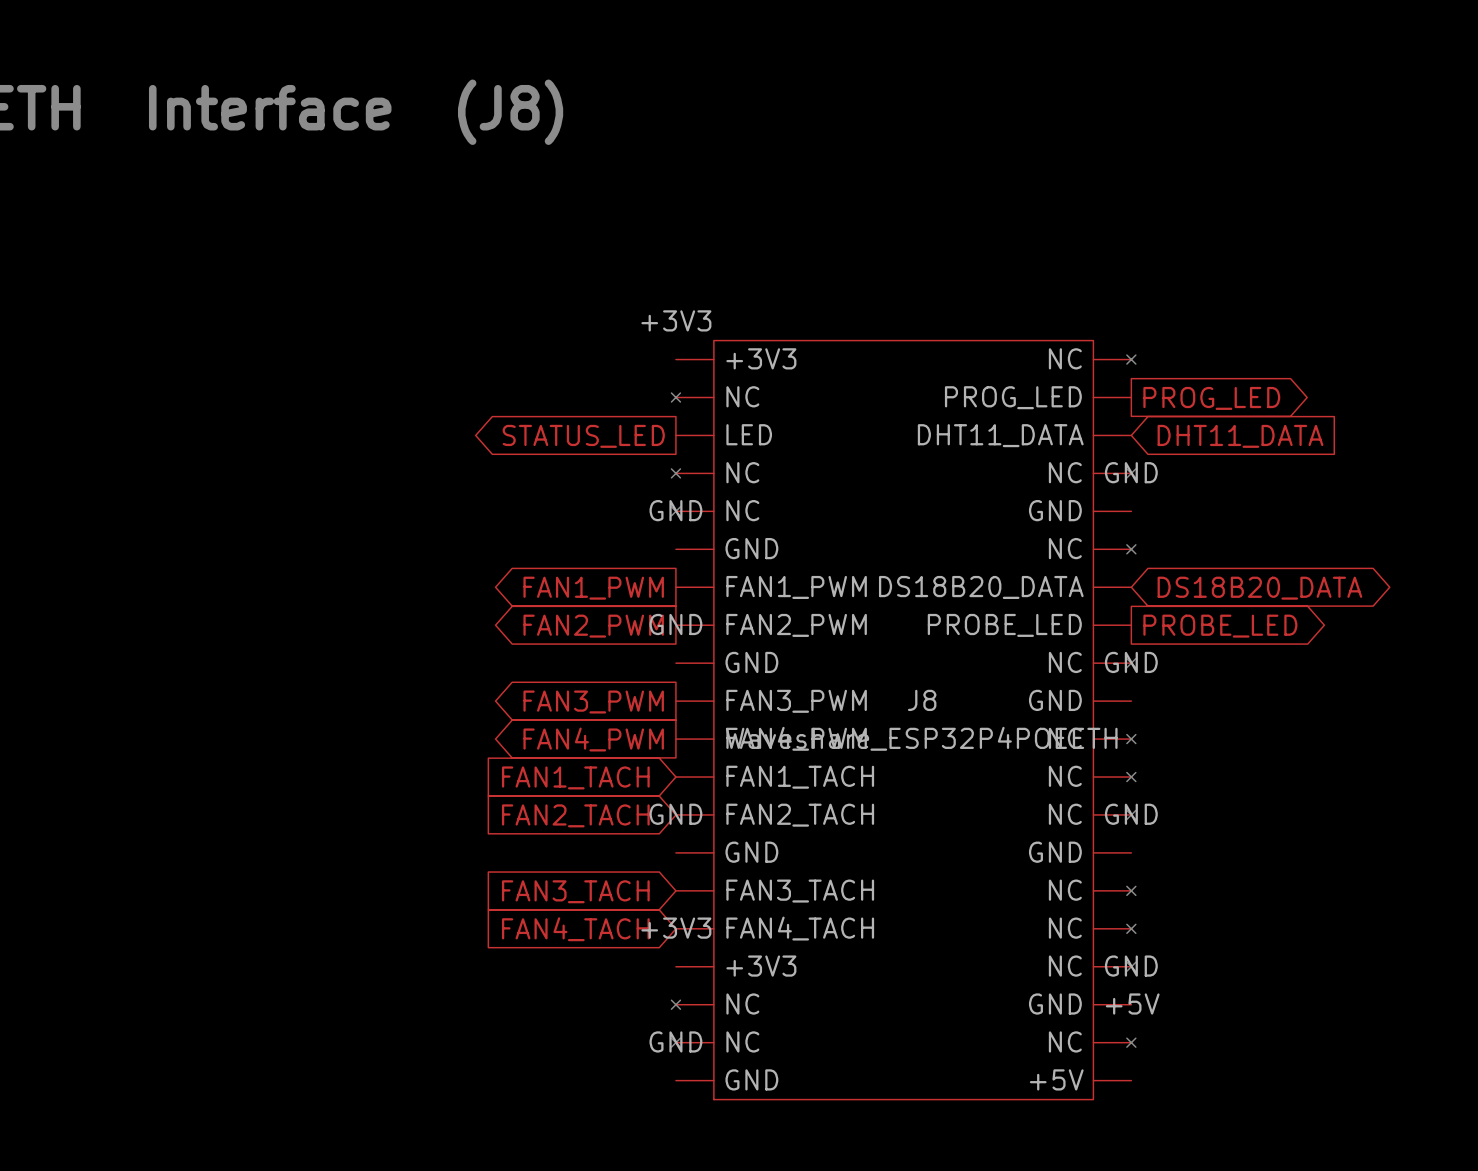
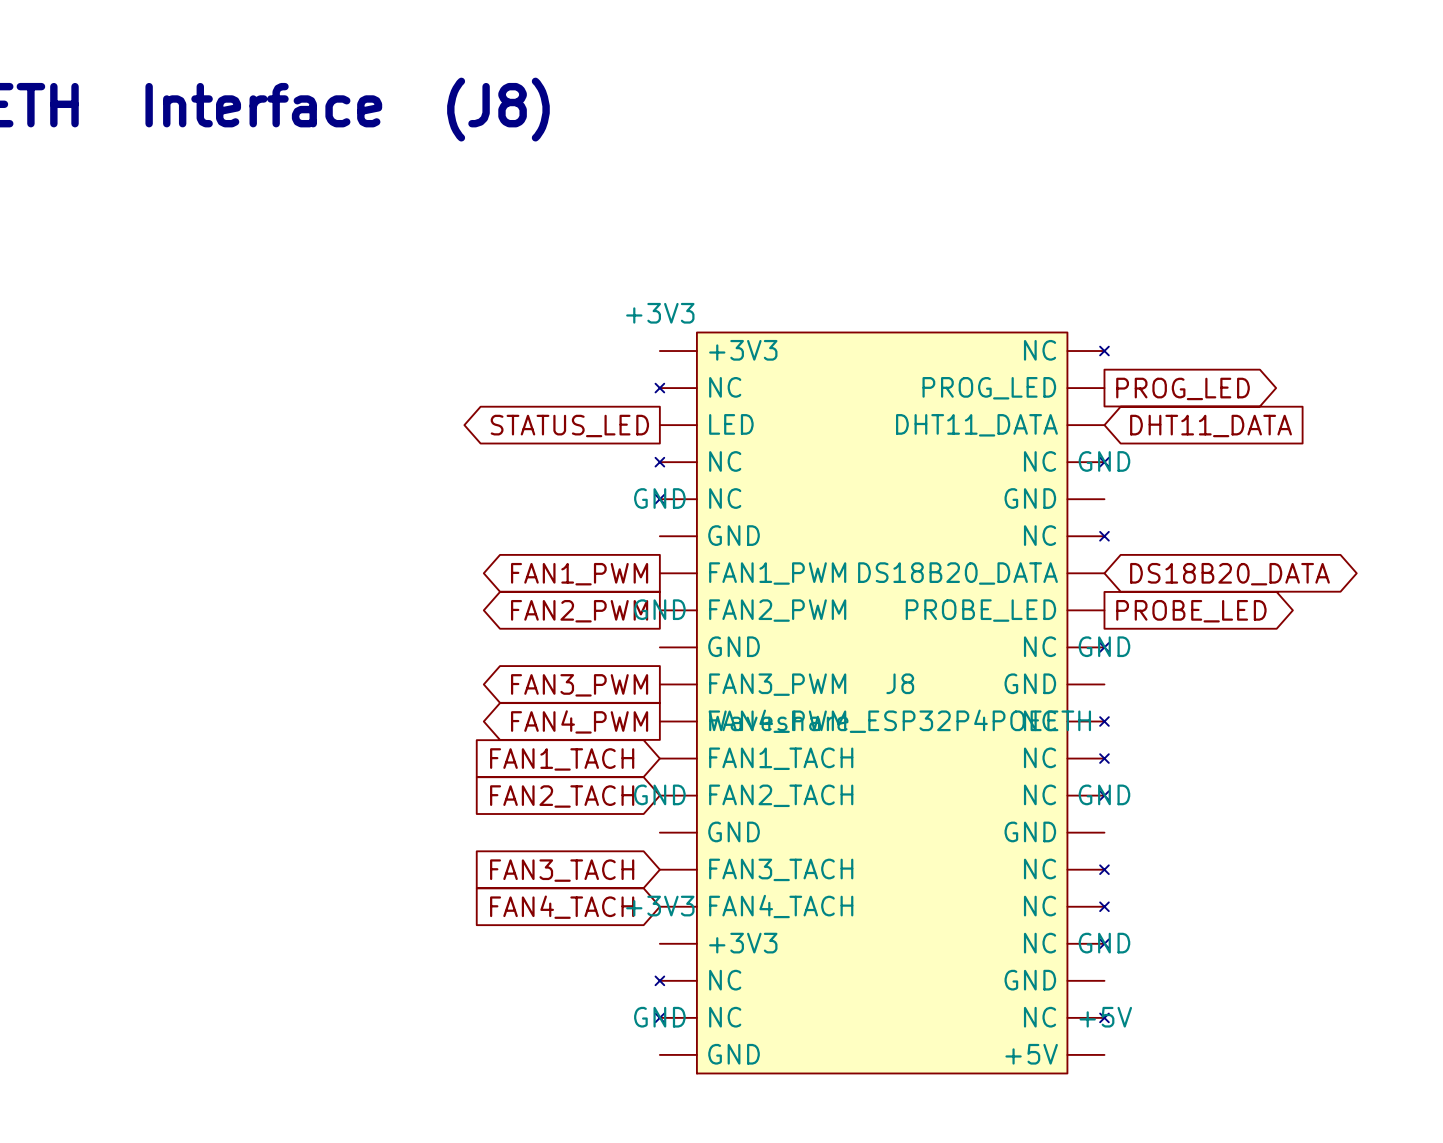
power symbol position: +5V (1132, 1004) -> +5V (1105, 1017)

